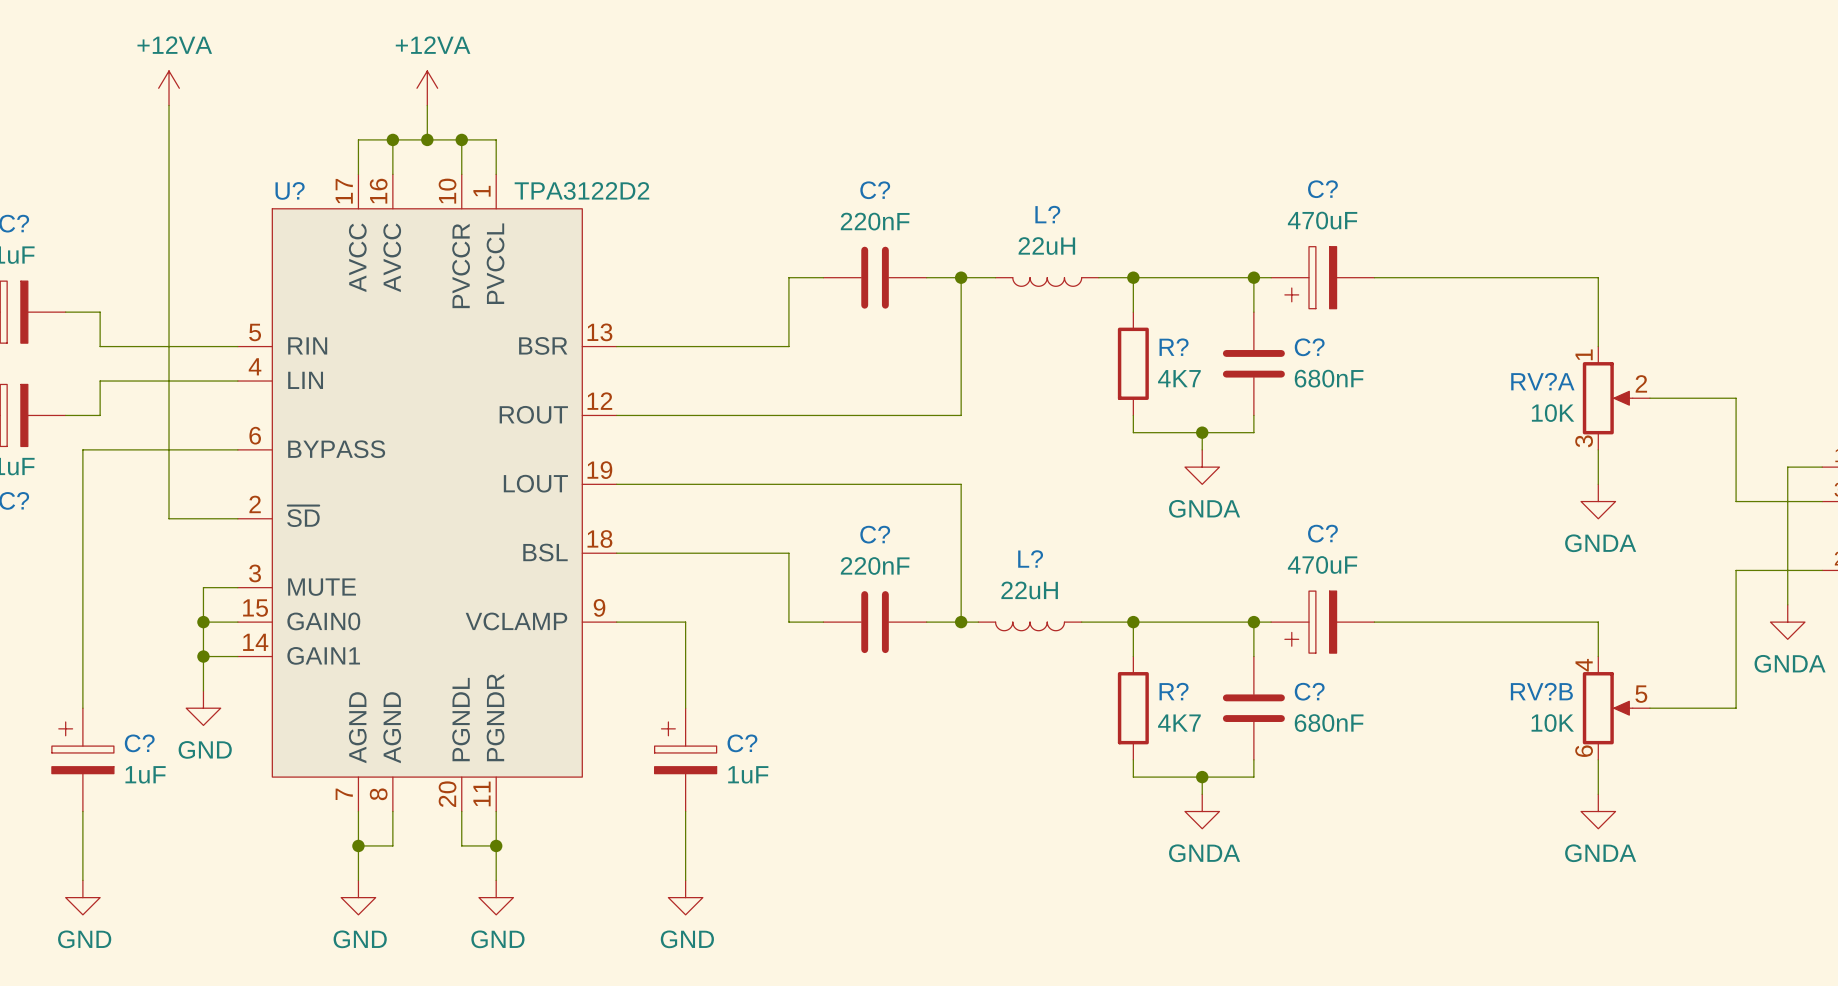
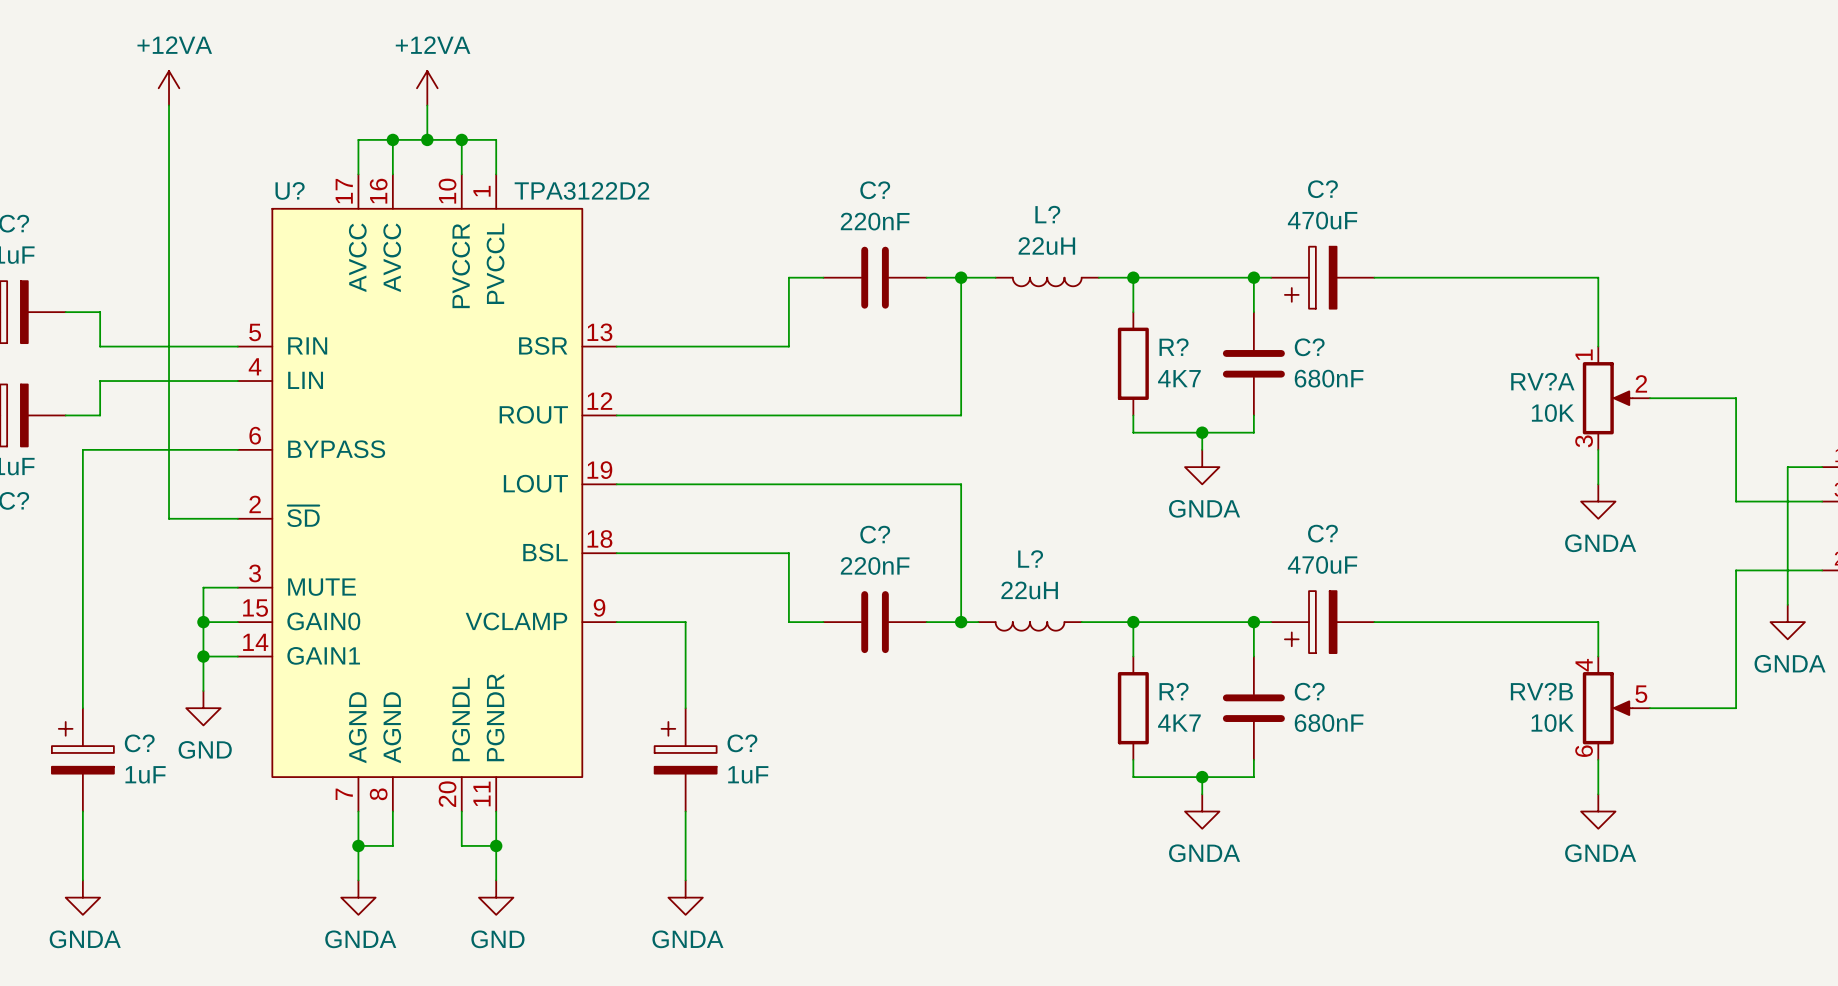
power symbol: GND (82, 897) -> GNDA (82, 897)
power symbol: GND (358, 897) -> GNDA (358, 897)
power symbol: GND (685, 897) -> GNDA (685, 897)

